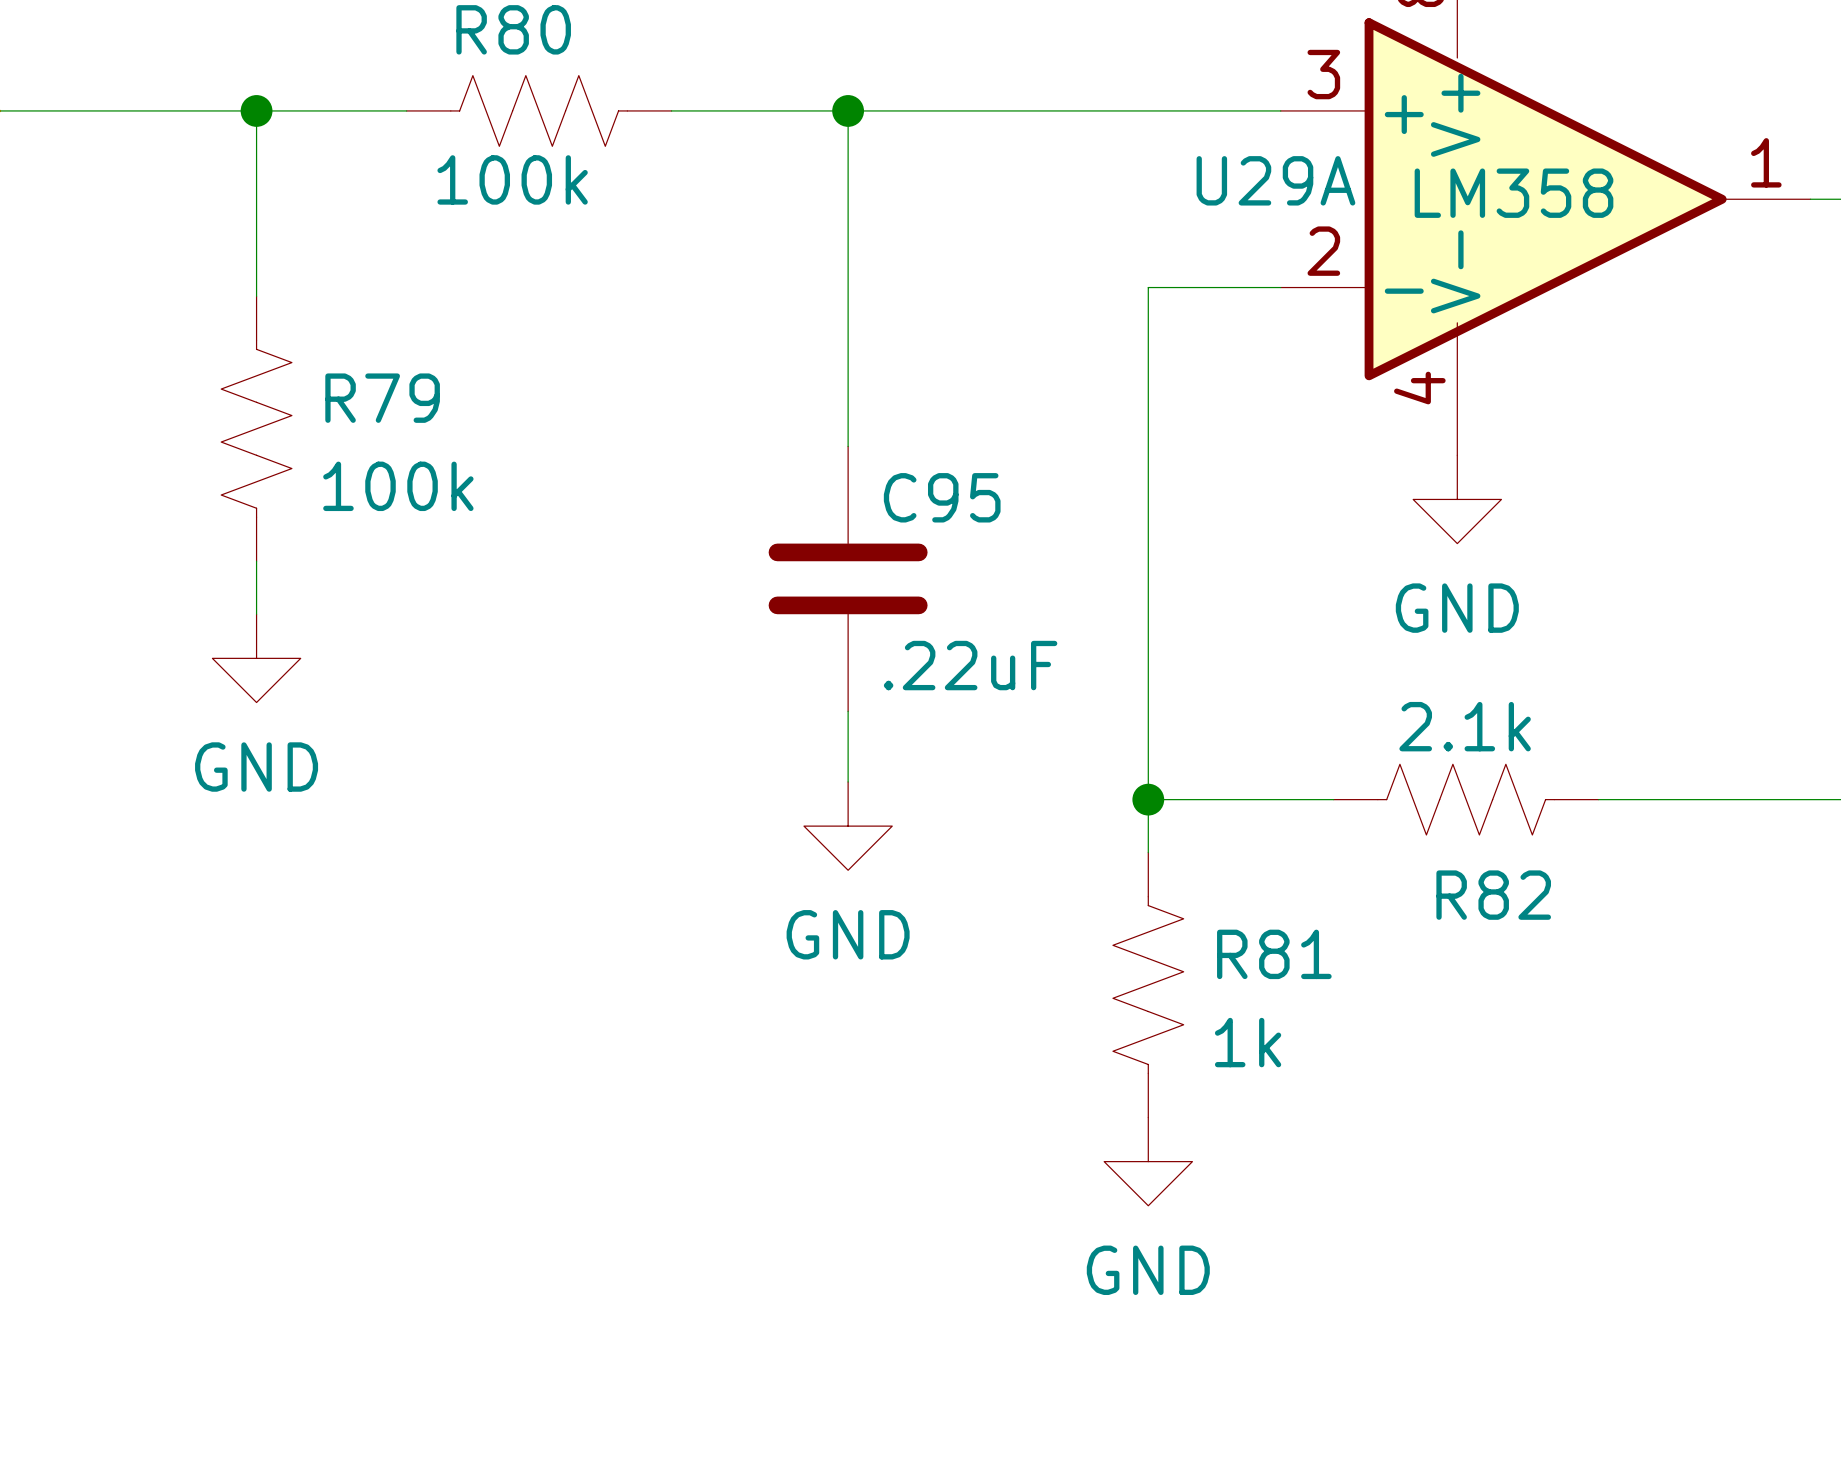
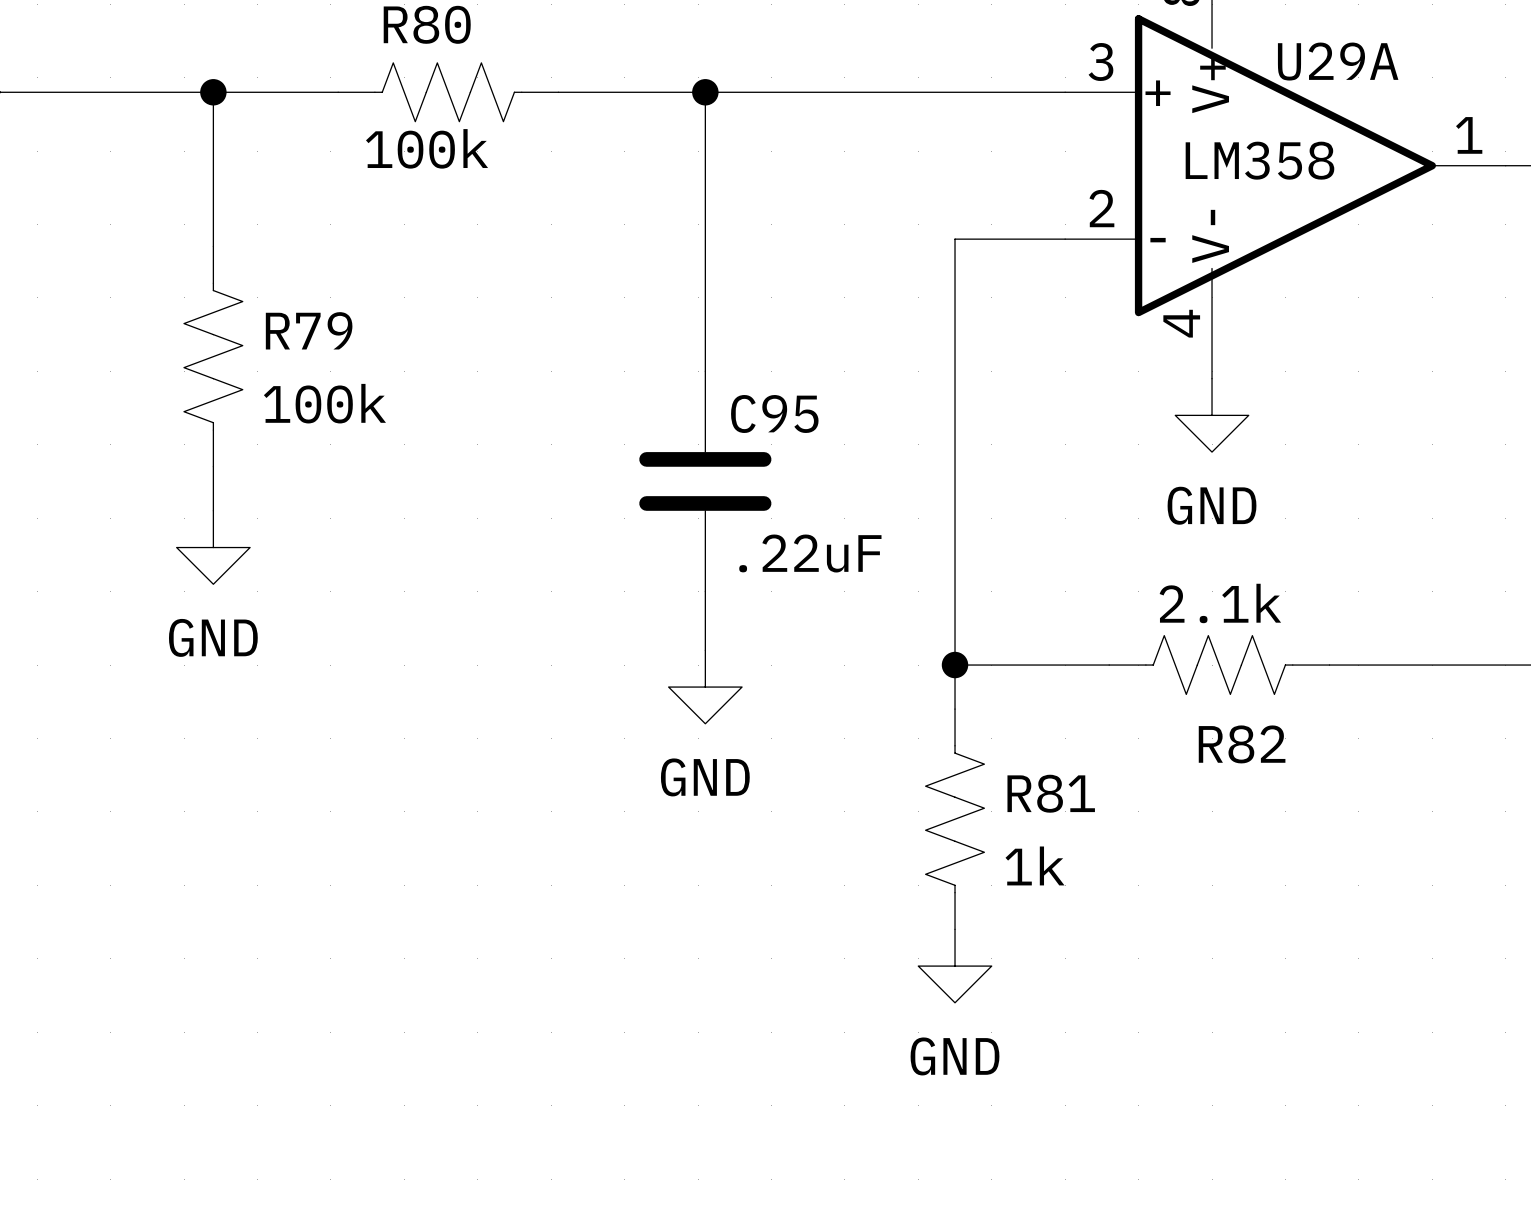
U29A name position: U29A (1275, 180) -> U29A (1338, 61)

